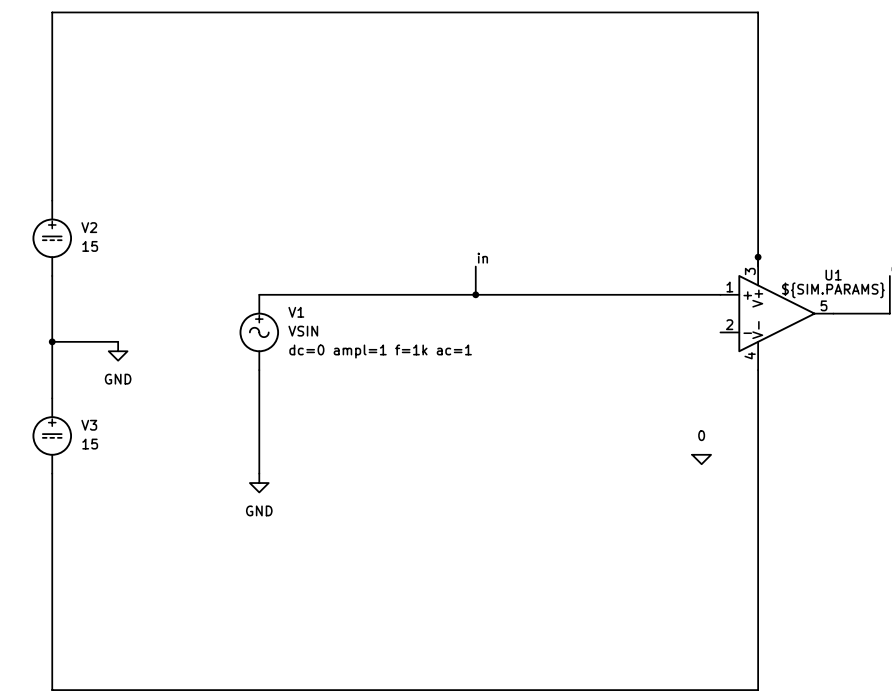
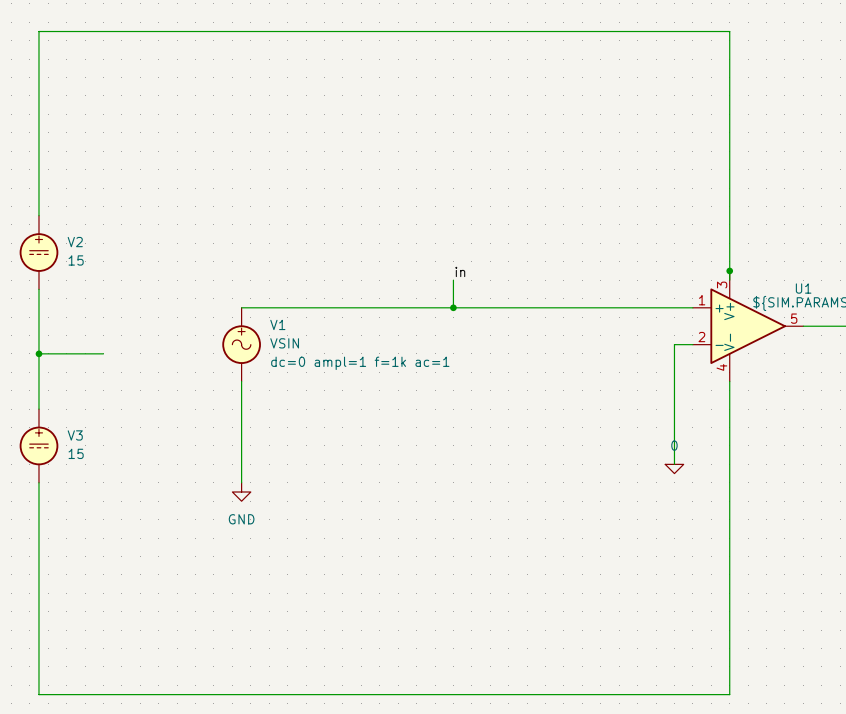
wire: none -> (692, 344) (674, 344) (674, 464)
power symbol: GND (118, 351) -> none

